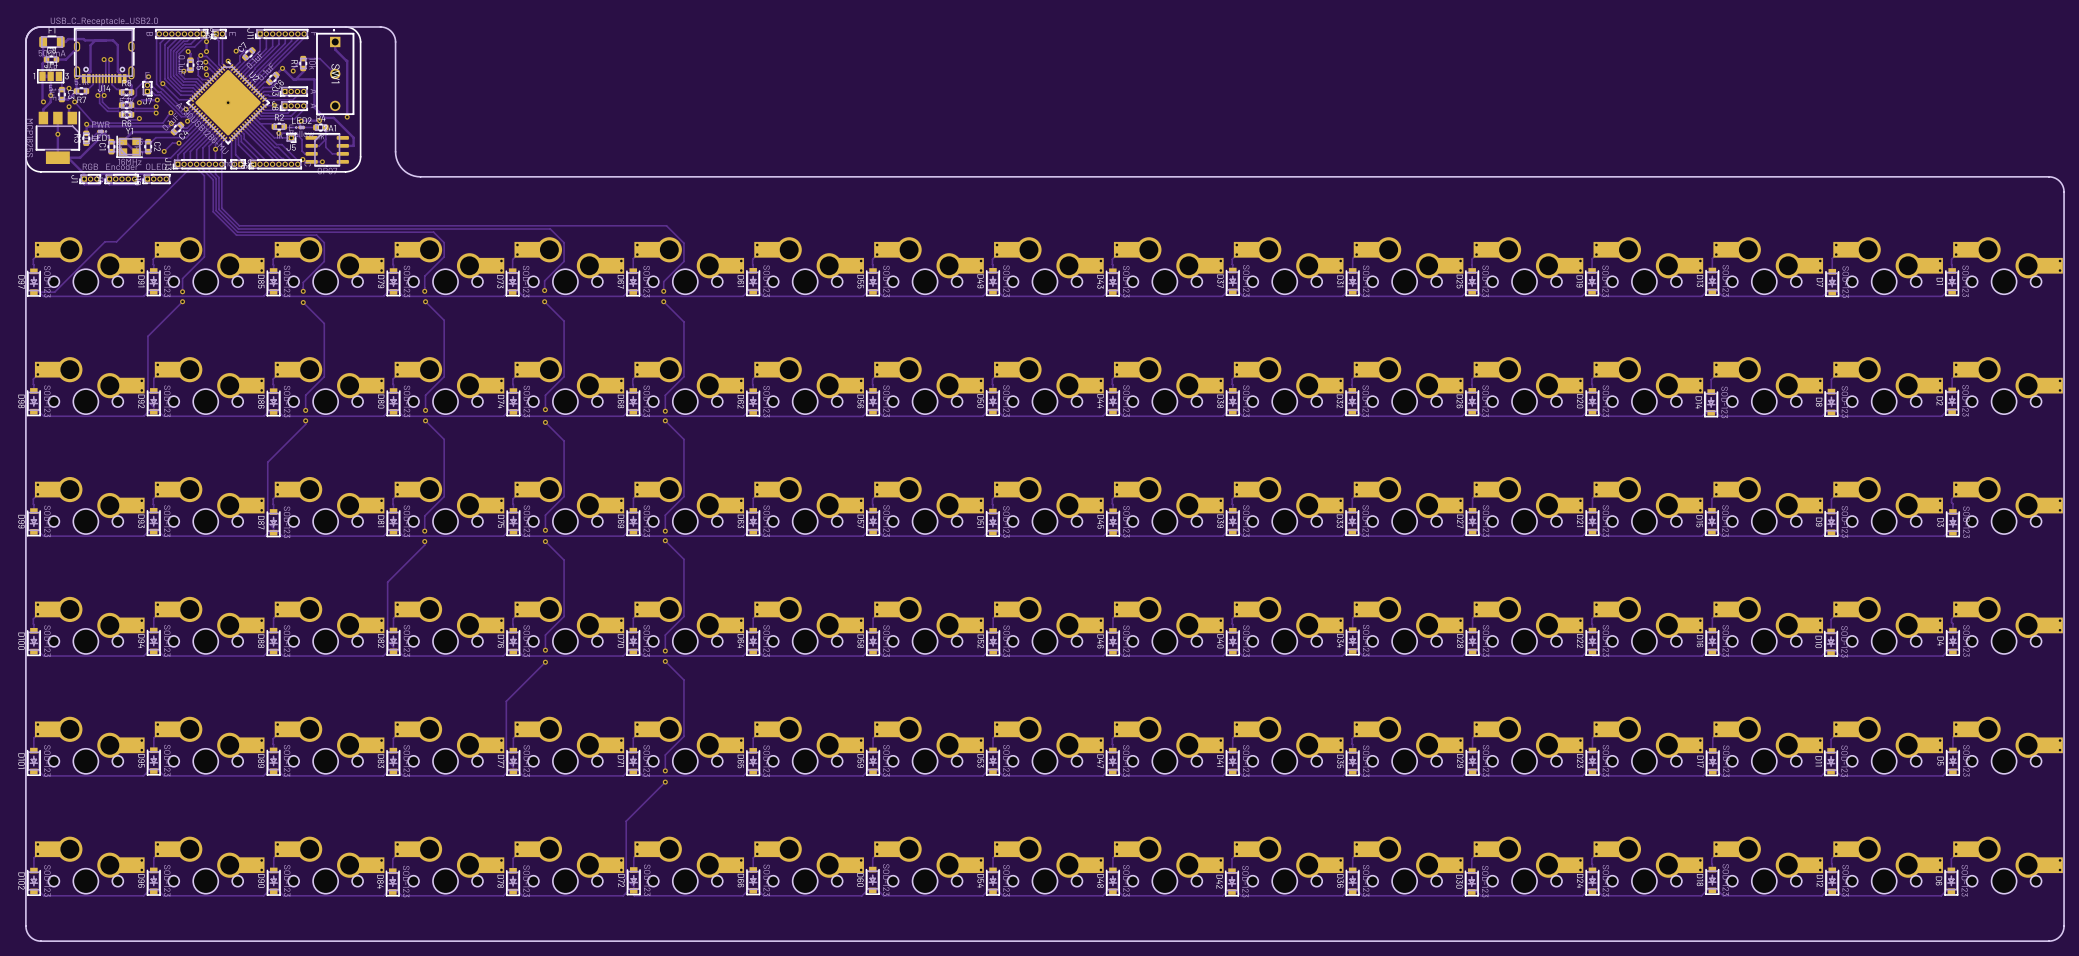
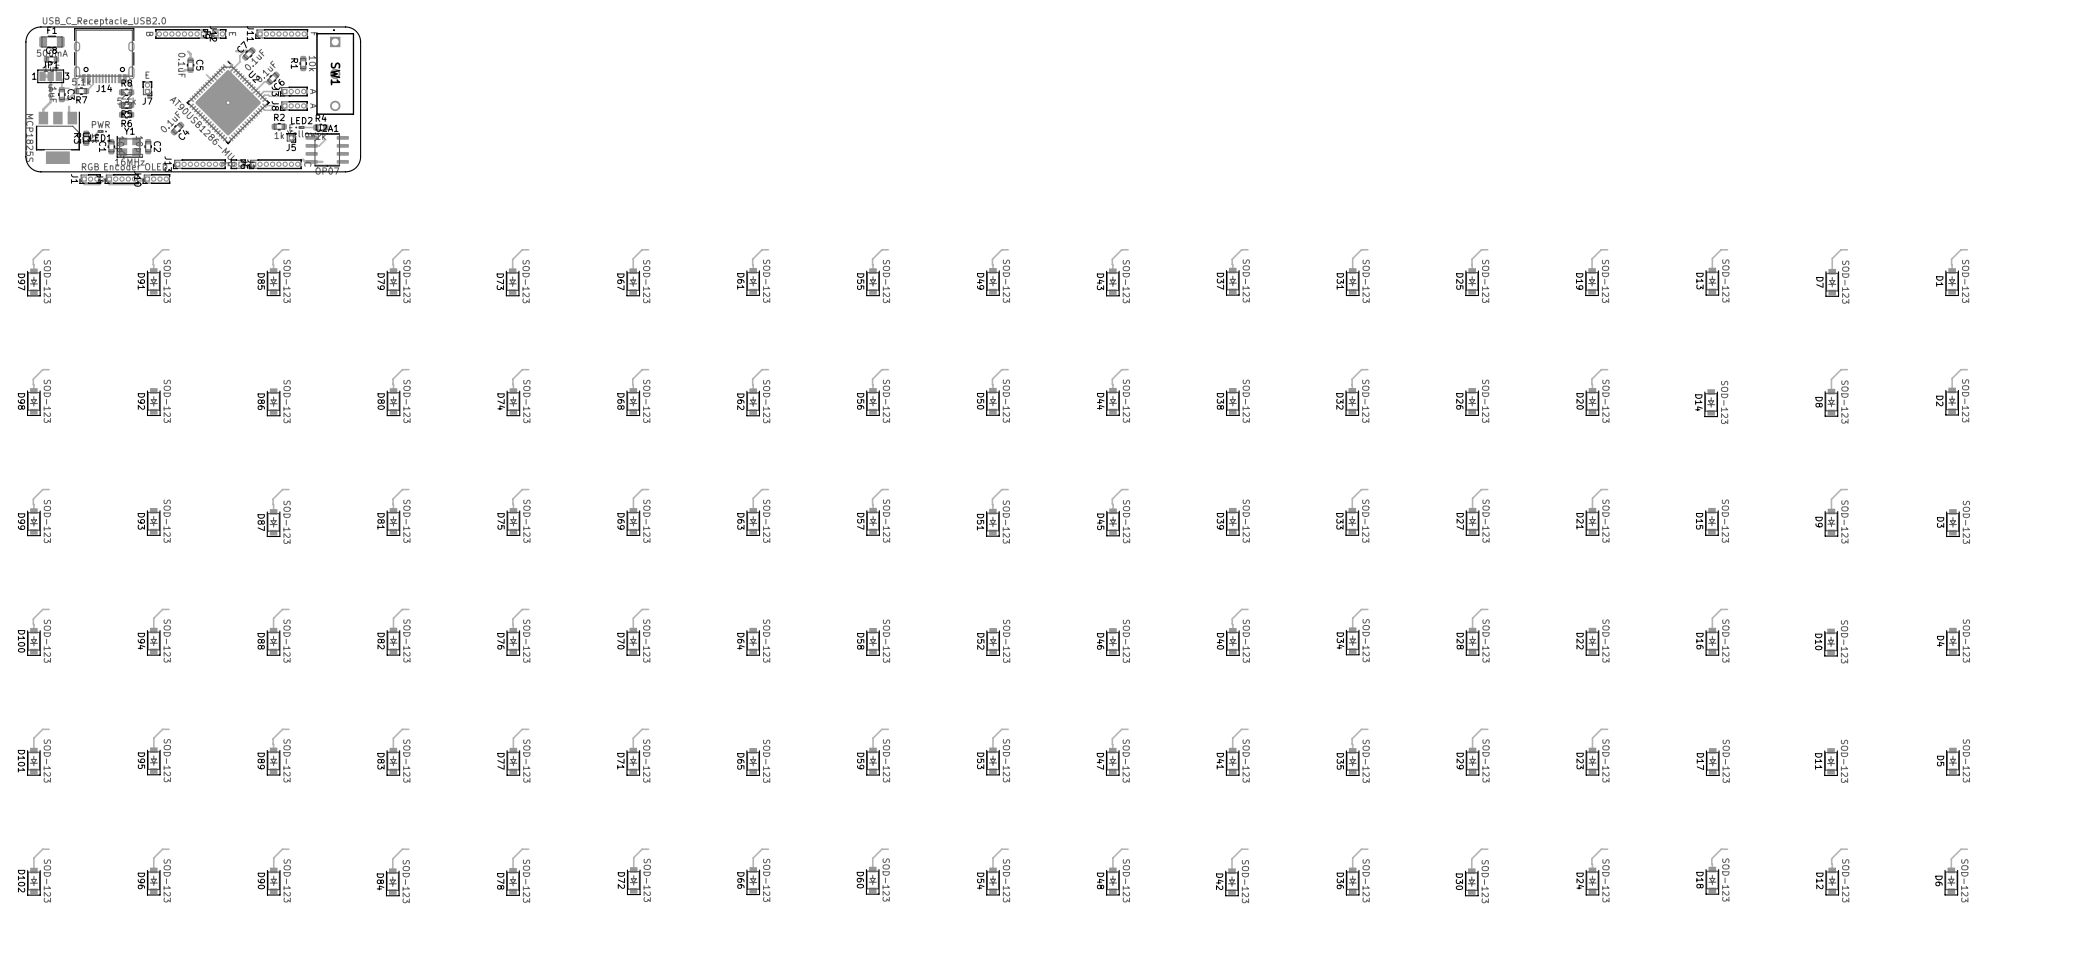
track: (159, 33) (156, 36) (156, 84) (182, 109) (188, 109) (191, 105) -> none
track: (165, 33) (165, 37) (160, 43) (160, 81) (178, 99) (191, 99) -> none
track: (171, 33) (171, 37) (165, 44) (165, 79) (180, 95) (191, 95) (194, 97) -> none
track: (178, 33) (178, 37) (167, 48) (167, 78) (181, 91) (192, 91) (196, 95) -> none
track: (184, 33) (184, 36) (170, 50) (170, 76) (181, 87) (193, 87) (198, 93) -> none
track: (190, 33) (190, 37) (187, 41) (183, 41) (173, 51) (173, 75) (182, 85) (194, 85) (200, 90) -> none
track: (197, 33) (197, 37) (190, 44) (184, 44) (176, 52) (176, 74) (183, 81) (196, 81) (202, 88) -> none
track: (203, 33) (203, 38) (194, 46) (185, 46) (179, 53) (179, 73) (184, 78) (197, 78) (205, 86) -> none
track: (216, 33) (216, 38) (218, 40) (218, 64) (222, 68) -> none
track: (222, 33) (222, 63) (225, 66) -> none
track: (260, 33) (260, 50) (237, 73) -> none
track: (266, 33) (266, 48) (239, 75) -> none
track: (272, 33) (272, 46) (242, 77) -> none
track: (278, 33) (278, 44) (244, 79) -> none
track: (285, 33) (285, 43) (246, 81) -> none
track: (291, 33) (291, 41) (248, 84) -> none
track: (297, 33) (297, 39) (251, 86) -> none
track: (304, 33) (304, 37) (253, 88) -> none
track: (95, 40) (90, 45) (88, 78) -> none
track: (43, 41) (43, 56) (46, 59) (42, 63) (43, 101) -> none
track: (60, 41) (65, 41) (68, 39) (113, 40) (117, 45) (119, 78) -> none
track: (206, 41) (206, 51) -> none
via: (206, 41) -> none
track: (335, 41) (335, 49) (347, 60) (347, 117) -> none
track: (77, 46) (65, 59) (56, 59) -> none
via: (188, 51) -> none
via: (206, 51) -> none
via: (236, 51) -> none
via: (200, 55) -> none
track: (245, 57) (245, 60) (235, 70) -> none
track: (104, 59) (105, 61) (105, 78) -> none
via: (104, 59) -> none
track: (110, 59) (108, 61) (108, 78) -> none
via: (110, 59) -> none
via: (228, 61) -> none
track: (205, 62) (218, 73) -> none
via: (205, 62) -> none
track: (205, 68) (209, 68) (216, 75) -> none
via: (205, 68) -> none
via: (282, 68) -> none
track: (303, 68) (303, 71) (295, 79) -> none
track: (220, 70) (206, 56) (200, 55) (198, 57) (198, 75) (202, 79) (207, 79) (209, 81) -> none
via: (183, 71) -> none
track: (293, 71) (293, 68) (303, 58) (319, 58) (335, 73) -> none
via: (293, 71) -> none
via: (206, 74) -> none
track: (148, 76) (136, 88) (136, 95) (133, 98) (126, 99) (126, 118) (128, 119) (139, 118) -> none
via: (148, 76) -> none
track: (99, 78) (97, 95) (99, 103) (107, 111) (118, 111) (121, 114) -> none
track: (102, 78) (104, 95) (102, 102) (108, 108) (118, 108) (121, 105) -> none
track: (112, 78) (112, 84) (121, 92) -> none
via: (162, 83) -> none
track: (147, 85) (151, 85) (158, 92) (161, 92) (182, 113) (188, 113) (194, 107) -> none
via: (69, 88) -> none
track: (147, 91) (159, 95) (181, 116) (189, 116) (196, 110) -> none
track: (297, 91) (297, 95) (293, 99) (264, 99) -> none
track: (257, 93) (263, 87) (270, 87) (276, 82) (276, 74) (282, 68) (293, 79) (314, 79) (314, 107) (324, 117) (333, 117) (353, 137) (353, 145) (342, 145) -> none
via: (97, 95) -> none
via: (104, 95) -> none
track: (157, 100) (141, 100) (139, 102) -> none
via: (157, 100) -> none
via: (43, 101) -> none
track: (74, 101) (93, 123) (162, 123) (170, 112) -> none
via: (74, 101) -> none
via: (139, 102) -> none
track: (228, 102) (217, 102) (188, 131) (132, 132) (123, 141) -> none
track: (131, 105) (134, 108) (154, 108) (156, 106) -> none
via: (274, 105) -> none
track: (291, 105) (291, 109) (287, 113) (262, 113) (260, 110) -> none
track: (297, 105) (297, 109) (291, 115) (261, 115) (257, 112) -> none
track: (303, 105) (303, 109) (294, 118) (259, 118) (255, 114) -> none
via: (69, 106) -> none
via: (156, 106) -> none
via: (186, 109) -> none
via: (170, 112) -> none
track: (198, 112) (187, 121) -> none
track: (156, 113) (154, 111) (134, 111) (131, 114) -> none
via: (156, 113) -> none
track: (200, 114) (186, 128) (171, 123) (168, 126) (88, 126) (86, 124) (86, 133) -> none
track: (253, 116) (274, 137) (291, 137) -> none
via: (347, 117) -> none
track: (57, 118) (57, 157) (80, 157) (97, 140) (102, 131) (111, 141) (124, 141) (135, 152) (148, 151) -> none
via: (139, 118) -> none
track: (205, 119) (186, 137) (155, 137) (151, 141) (136, 141) -> none
track: (251, 119) (276, 144) (281, 144) (297, 160) (297, 164) -> none
track: (319, 120) (301, 120) (299, 127) (284, 126) -> none
via: (319, 120) -> none
via: (187, 121) -> none
track: (207, 121) (170, 157) (129, 157) (122, 151) (111, 151) -> none
track: (248, 121) (275, 147) (278, 147) (291, 160) (291, 164) -> none
via: (301, 121) -> none
via: (171, 123) -> none
track: (209, 123) (177, 155) (177, 164) -> none
track: (246, 123) (285, 160) (285, 164) -> none
track: (260, 123) (271, 123) (274, 126) -> none
via: (86, 124) -> none
track: (211, 125) (184, 153) (184, 164) -> none
track: (244, 125) (278, 160) (278, 164) -> none
track: (214, 127) (190, 151) (190, 168) (116, 241) (105, 241) (54, 292) (33, 292) -> none
track: (242, 127) (272, 158) (272, 164) -> none
track: (325, 127) (325, 147) (332, 153) (342, 153) -> none
track: (216, 130) (196, 149) (196, 168) (204, 175) (204, 256) (182, 278) (182, 291) -> none
track: (239, 130) (244, 134) (244, 139) (266, 161) (266, 164) -> none
track: (218, 132) (202, 147) (202, 169) (213, 179) (213, 211) (236, 235) (316, 235) (324, 242) (324, 261) (303, 282) (303, 291) -> none
track: (237, 132) (241, 135) (241, 141) (259, 160) (259, 164) -> none
track: (278, 133) (295, 133) (302, 139) (302, 151) (304, 153) (311, 153) -> none
via: (278, 133) -> none
via: (57, 134) -> none
track: (220, 134) (209, 146) (209, 171) (216, 178) (216, 210) (237, 232) (433, 232) (444, 242) (444, 256) (424, 276) (424, 291) -> none
track: (235, 134) (238, 137) (238, 144) (253, 159) (253, 164) -> none
track: (222, 136) (215, 144) (215, 174) (218, 177) (218, 209) (238, 229) (550, 229) (564, 242) (564, 261) (544, 280) (544, 290) -> none
track: (233, 136) (235, 139) (235, 154) (240, 159) (240, 164) -> none
track: (225, 139) (221, 142) (221, 208) (239, 225) (666, 225) (683, 243) (683, 261) (663, 281) (663, 291) -> none
track: (231, 139) (231, 161) (234, 164) -> none
track: (179, 143) (172, 143) (164, 151) -> none
via: (179, 143) -> none
via: (215, 149) -> none
via: (164, 151) -> none
track: (67, 157) (84, 173) (84, 184) -> none
via: (302, 159) -> none
via: (322, 161) -> none
track: (115, 175) (101, 173) (96, 179) -> none
track: (115, 175) (152, 173) (153, 179) -> none
board edge: (2064, 191) (2064, 926) (2062, 933) (2054, 940) (40, 941) (33, 939) (27, 931) (25, 41) (29, 32) (35, 28) (386, 28) (392, 32) (395, 40) (396, 158) (402, 169) (417, 176) (2049, 176) (2059, 181) (2064, 191) -> none
part: (89, 265) -> none
part: (209, 265) -> none
part: (329, 265) -> none
part: (449, 265) -> none
part: (569, 265) -> none
part: (689, 265) -> none
part: (809, 265) -> none
part: (928, 265) -> none
part: (1048, 265) -> none
part: (1168, 265) -> none
part: (1288, 265) -> none
part: (1408, 265) -> none
part: (1528, 265) -> none
part: (1648, 265) -> none
part: (1768, 265) -> none
part: (1888, 265) -> none
part: (2008, 265) -> none
via: (544, 290) -> none
via: (182, 291) -> none
via: (303, 291) -> none
via: (424, 291) -> none
via: (663, 291) -> none
track: (1952, 291) (1946, 291) (1942, 296) (1841, 296) (1837, 292) (1826, 292) (1823, 296) (1722, 296) (1717, 291) (1706, 291) (1701, 296) (1602, 296) (1597, 291) (1586, 291) (1582, 296) (1482, 296) (1477, 291) (1466, 291) (1462, 296) (1362, 296) (1358, 291) (1347, 291) (1342, 296) (1243, 296) (1238, 291) (1227, 291) (1222, 296) (1122, 296) (1118, 292) (1107, 292) (1103, 296) (1003, 296) (998, 291) (987, 291) (982, 296) (882, 296) (878, 291) (867, 291) (863, 296) (763, 296) (758, 291) (747, 291) (743, 296) (642, 296) (638, 291) (627, 291) (623, 296) (523, 296) (518, 291) (508, 291) (503, 296) (403, 296) (398, 291) (388, 291) (383, 296) (283, 296) (278, 291) (268, 291) (263, 296) (163, 296) (159, 291) (148, 291) (143, 296) (43, 296) (39, 292) -> none
track: (182, 301) (147, 336) (147, 401) (153, 407) (153, 411) -> none
via: (182, 301) -> none
track: (425, 301) (444, 320) (444, 376) (425, 395) (425, 410) -> none
via: (425, 301) -> none
track: (544, 301) (564, 321) (564, 376) (545, 395) (545, 409) -> none
via: (544, 301) -> none
track: (663, 301) (683, 321) (683, 376) (665, 395) (665, 411) -> none
via: (663, 301) -> none
track: (303, 302) (324, 323) (324, 376) (305, 395) (305, 410) -> none
via: (303, 302) -> none
track: (168, 369) (162, 369) (153, 378) (153, 390) -> none
track: (288, 369) (282, 369) (273, 379) (273, 391) -> none
track: (1247, 369) (1241, 369) (1232, 379) (1232, 390) -> none
track: (1487, 369) (1481, 369) (1472, 379) (1472, 390) -> none
track: (1727, 369) (1721, 369) (1711, 379) (1711, 392) -> none
part: (89, 385) -> none
part: (209, 385) -> none
part: (329, 385) -> none
part: (449, 385) -> none
part: (569, 385) -> none
part: (689, 385) -> none
part: (809, 385) -> none
part: (928, 385) -> none
part: (1048, 385) -> none
part: (1168, 385) -> none
part: (1288, 385) -> none
part: (1408, 385) -> none
part: (1528, 385) -> none
part: (1648, 385) -> none
part: (1768, 385) -> none
part: (1888, 385) -> none
part: (2008, 385) -> none
via: (545, 409) -> none
via: (305, 410) -> none
via: (425, 410) -> none
via: (665, 411) -> none
track: (1952, 411) (1946, 411) (1941, 416) (1840, 416) (1836, 412) (1826, 412) (1822, 416) (1719, 416) (1716, 412) (1705, 412) (1702, 416) (1602, 416) (1597, 411) (1587, 411) (1582, 416) (1482, 416) (1477, 411) (1466, 411) (1462, 416) (1362, 416) (1357, 411) (1346, 411) (1342, 416) (1242, 416) (1238, 411) (1227, 411) (1222, 416) (1123, 416) (1118, 411) (1107, 411) (1102, 416) (1003, 416) (998, 411) (987, 411) (982, 416) (882, 416) (878, 411) (867, 411) (862, 416) (758, 416) (754, 412) (747, 412) (743, 416) (643, 416) (638, 411) (627, 411) (623, 416) (523, 416) (518, 411) (508, 411) (503, 416) (403, 416) (398, 411) (388, 411) (383, 416) (283, 416) (278, 411) (268, 411) (263, 416) (163, 416) (159, 411) (148, 411) (143, 416) (43, 416) (39, 411) (33, 411) -> none
track: (305, 420) (305, 424) (267, 462) (267, 522) (273, 528) (273, 532) -> none
via: (305, 420) -> none
track: (425, 420) (444, 439) (444, 496) (424, 516) (424, 531) -> none
via: (425, 420) -> none
track: (665, 420) (683, 439) (683, 496) (665, 515) (665, 531) -> none
via: (665, 420) -> none
track: (545, 422) (564, 441) (564, 496) (545, 515) (545, 530) -> none
via: (545, 422) -> none
track: (168, 489) (162, 489) (153, 499) (153, 510) -> none
track: (1247, 489) (1241, 489) (1232, 499) (1232, 510) -> none
track: (1727, 489) (1721, 489) (1711, 498) (1711, 510) -> none
track: (1967, 489) (1961, 489) (1951, 499) (1952, 511) -> none
part: (89, 505) -> none
part: (209, 505) -> none
part: (329, 505) -> none
part: (449, 505) -> none
part: (569, 505) -> none
part: (689, 505) -> none
part: (809, 505) -> none
part: (928, 505) -> none
part: (1048, 505) -> none
part: (1168, 505) -> none
part: (1288, 505) -> none
part: (1408, 505) -> none
part: (1528, 505) -> none
part: (1648, 505) -> none
part: (1768, 505) -> none
part: (1888, 505) -> none
part: (2008, 505) -> none
via: (545, 530) -> none
track: (33, 531) (39, 531) (43, 536) (143, 536) (148, 531) (159, 531) (163, 536) (264, 536) (268, 532) (278, 532) (282, 536) (383, 536) (388, 531) (398, 531) (403, 536) (503, 536) (508, 531) (518, 531) (523, 536) (623, 536) (628, 531) (638, 531) (643, 536) (743, 536) (747, 531) (758, 531) (763, 536) (863, 536) (867, 531) (878, 531) (883, 536) (983, 536) (987, 532) (998, 532) (1001, 536) (1103, 536) (1107, 532) (1118, 532) (1122, 536) (1222, 536) (1227, 531) (1238, 531) (1242, 536) (1342, 536) (1346, 531) (1357, 531) (1362, 536) (1462, 536) (1467, 531) (1477, 531) (1482, 536) (1582, 536) (1587, 531) (1597, 531) (1602, 536) (1701, 536) (1706, 531) (1717, 531) (1721, 536) (1822, 536) (1826, 532) (1836, 532) (1840, 536) (1944, 536) (1947, 532) (1952, 532) -> none
via: (424, 531) -> none
via: (665, 531) -> none
track: (665, 540) (683, 559) (683, 616) (665, 635) (665, 651) -> none
via: (665, 540) -> none
track: (424, 541) (424, 545) (387, 582) (387, 641) (393, 646) (393, 651) -> none
via: (424, 541) -> none
track: (545, 541) (564, 560) (564, 616) (545, 635) (545, 650) -> none
via: (545, 541) -> none
track: (768, 609) (762, 609) (753, 618) (753, 630) -> none
track: (888, 609) (881, 609) (873, 618) (873, 630) -> none
track: (1008, 609) (1001, 609) (993, 618) (993, 630) -> none
track: (1128, 609) (1121, 609) (1112, 618) (1112, 630) -> none
track: (1607, 609) (1601, 609) (1591, 618) (1592, 630) -> none
track: (1847, 609) (1841, 609) (1831, 619) (1831, 631) -> none
track: (1967, 609) (1961, 609) (1951, 618) (1952, 630) -> none
part: (89, 625) -> none
part: (209, 625) -> none
part: (329, 625) -> none
part: (449, 625) -> none
part: (569, 625) -> none
part: (689, 625) -> none
part: (809, 625) -> none
part: (928, 625) -> none
part: (1048, 625) -> none
part: (1168, 625) -> none
part: (1288, 625) -> none
part: (1408, 625) -> none
part: (1528, 625) -> none
part: (1648, 625) -> none
part: (1768, 625) -> none
part: (1888, 625) -> none
part: (2008, 625) -> none
via: (545, 650) -> none
via: (665, 651) -> none
track: (1952, 651) (1947, 651) (1942, 656) (1840, 656) (1836, 652) (1825, 652) (1821, 656) (1722, 656) (1717, 651) (1706, 651) (1702, 656) (1592, 656) (1592, 651) (1587, 651) (1582, 656) (1482, 656) (1477, 651) (1467, 651) (1462, 656) (1363, 656) (1358, 651) (1347, 651) (1342, 656) (1242, 656) (1238, 651) (1227, 651) (1223, 656) (1122, 656) (1118, 651) (1107, 651) (1103, 656) (1002, 656) (998, 651) (987, 651) (983, 656) (882, 656) (878, 651) (867, 651) (863, 656) (763, 656) (758, 651) (747, 651) (743, 656) (643, 656) (638, 651) (627, 651) (623, 656) (523, 656) (518, 651) (507, 651) (503, 656) (403, 656) (398, 651) (388, 651) (383, 656) (283, 656) (278, 651) (268, 651) (263, 656) (163, 656) (159, 651) (148, 651) (143, 656) (43, 656) (39, 651) (33, 651) -> none
track: (665, 661) (683, 680) (683, 736) (665, 755) (665, 770) -> none
via: (665, 661) -> none
track: (545, 662) (506, 701) (506, 759) (513, 767) (513, 771) -> none
via: (545, 662) -> none
track: (768, 729) (762, 729) (753, 738) (753, 750) -> none
track: (1727, 729) (1721, 729) (1712, 737) (1712, 750) -> none
track: (1847, 729) (1841, 729) (1831, 739) (1831, 750) -> none
track: (1967, 729) (1960, 729) (1952, 737) (1952, 750) -> none
part: (89, 745) -> none
part: (209, 745) -> none
part: (329, 745) -> none
part: (449, 745) -> none
part: (569, 745) -> none
part: (689, 745) -> none
part: (809, 745) -> none
part: (928, 745) -> none
part: (1048, 745) -> none
part: (1168, 745) -> none
part: (1288, 745) -> none
part: (1408, 745) -> none
part: (1528, 745) -> none
part: (1648, 745) -> none
part: (1768, 745) -> none
part: (1888, 745) -> none
part: (2008, 745) -> none
via: (665, 770) -> none
track: (1952, 771) (1947, 771) (1942, 775) (1840, 775) (1836, 771) (1825, 771) (1821, 775) (1722, 775) (1718, 771) (1707, 771) (1703, 775) (1602, 775) (1597, 771) (1587, 771) (1582, 775) (1482, 775) (1477, 771) (1467, 771) (1462, 775) (1362, 775) (1358, 771) (1347, 771) (1343, 775) (1242, 775) (1238, 771) (1227, 771) (1222, 775) (1122, 775) (1118, 771) (1107, 771) (1102, 775) (1003, 775) (998, 771) (987, 771) (982, 775) (883, 775) (878, 771) (867, 771) (863, 775) (762, 775) (758, 771) (747, 771) (743, 775) (643, 775) (638, 771) (627, 771) (623, 775) (523, 775) (518, 771) (507, 771) (503, 775) (403, 775) (398, 771) (387, 771) (383, 775) (283, 775) (278, 771) (268, 771) (263, 775) (164, 775) (159, 771) (148, 771) (143, 775) (43, 775) (39, 771) (33, 771) -> none
track: (665, 782) (626, 821) (626, 878) (633, 886) (634, 895) (742, 895) (747, 890) (758, 890) (763, 895) (861, 895) (867, 890) (878, 890) (883, 895) (983, 895) (987, 891) (998, 891) (1003, 895) (1102, 895) (1107, 891) (1118, 891) (1122, 895) (1222, 895) (1226, 891) (1237, 891) (1241, 895) (1342, 895) (1347, 891) (1358, 891) (1362, 895) (1462, 895) (1466, 891) (1477, 891) (1480, 895) (1582, 895) (1587, 891) (1597, 891) (1602, 895) (1701, 895) (1706, 890) (1717, 890) (1723, 895) (1822, 895) (1826, 891) (1837, 891) (1842, 895) (1941, 895) (1945, 891) (1951, 891) -> none
via: (665, 782) -> none
part: (89, 865) -> none
part: (209, 865) -> none
part: (329, 865) -> none
part: (449, 865) -> none
part: (569, 865) -> none
part: (689, 865) -> none
part: (809, 865) -> none
part: (928, 865) -> none
part: (1048, 865) -> none
part: (1168, 865) -> none
part: (1288, 865) -> none
part: (1408, 865) -> none
part: (1528, 865) -> none
part: (1648, 865) -> none
part: (1768, 865) -> none
part: (1888, 865) -> none
part: (2008, 865) -> none
track: (633, 890) (628, 890) (623, 895) (522, 895) (518, 891) (507, 891) (503, 895) (401, 895) (398, 891) (387, 891) (383, 895) (283, 895) (279, 891) (268, 891) (263, 895) (163, 895) (159, 891) (148, 891) (143, 895) (43, 895) (39, 891) (33, 891) -> none

